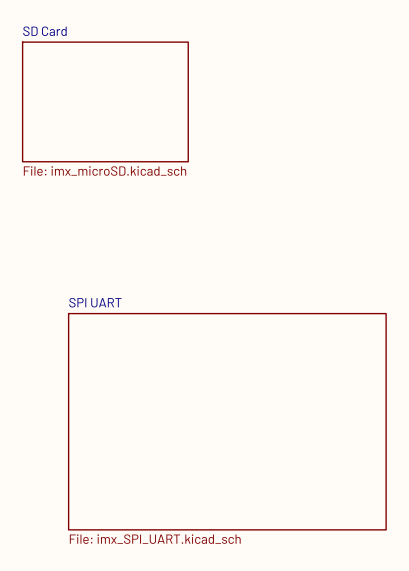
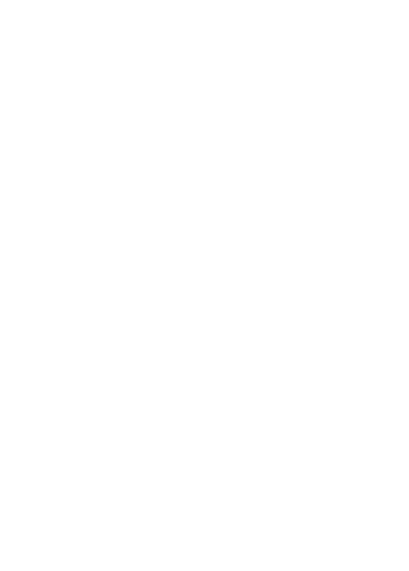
sheet SD Card: File: imx_microSD.kicad_sch (105, 101) -> none
sheet SPI UART: File: imx_SPI_UART.kicad_sch (227, 421) -> none

